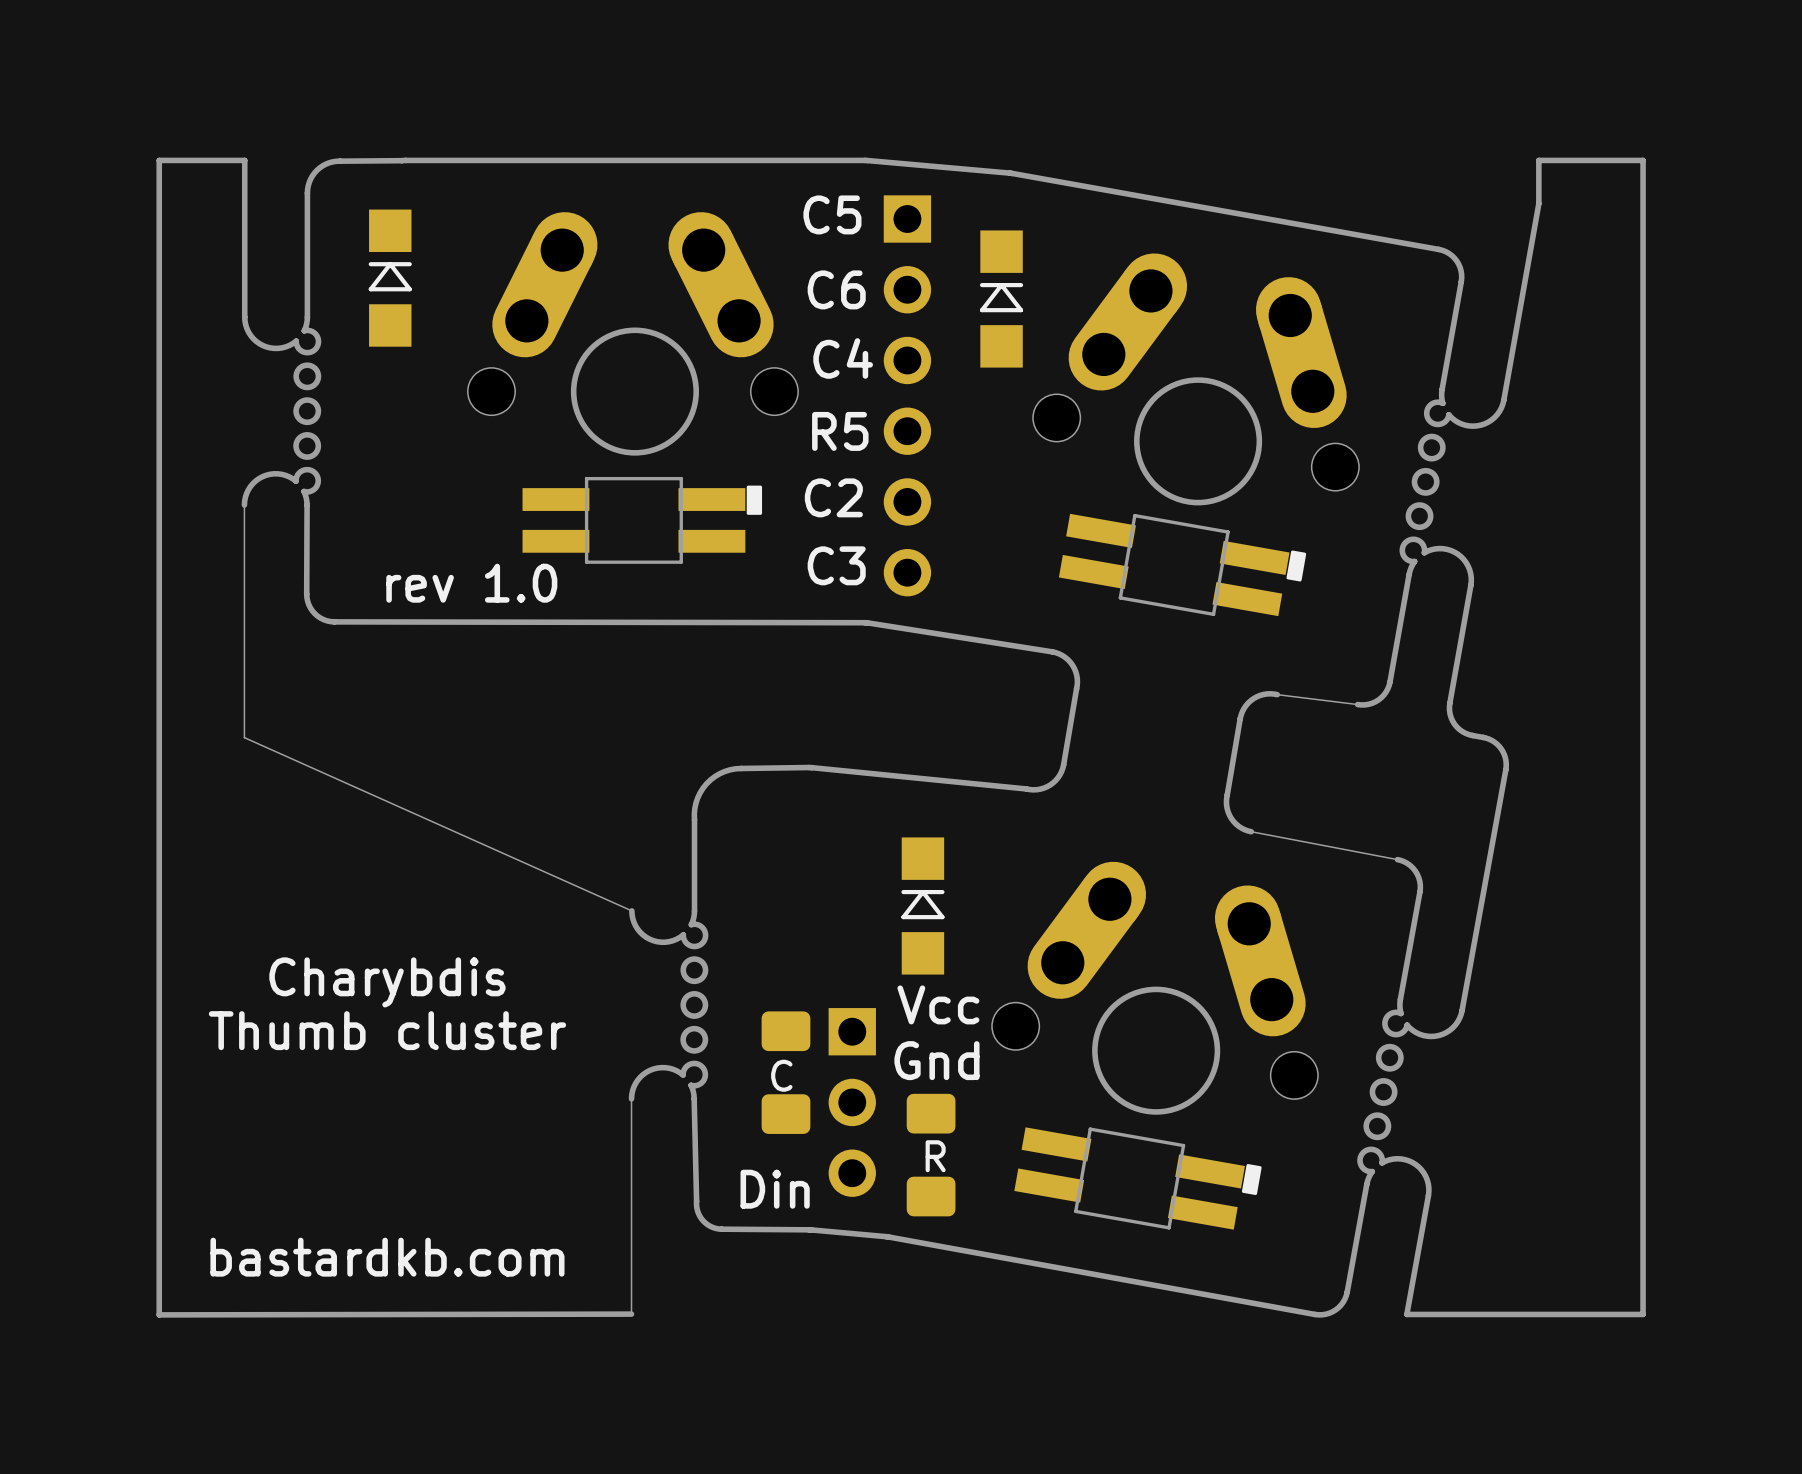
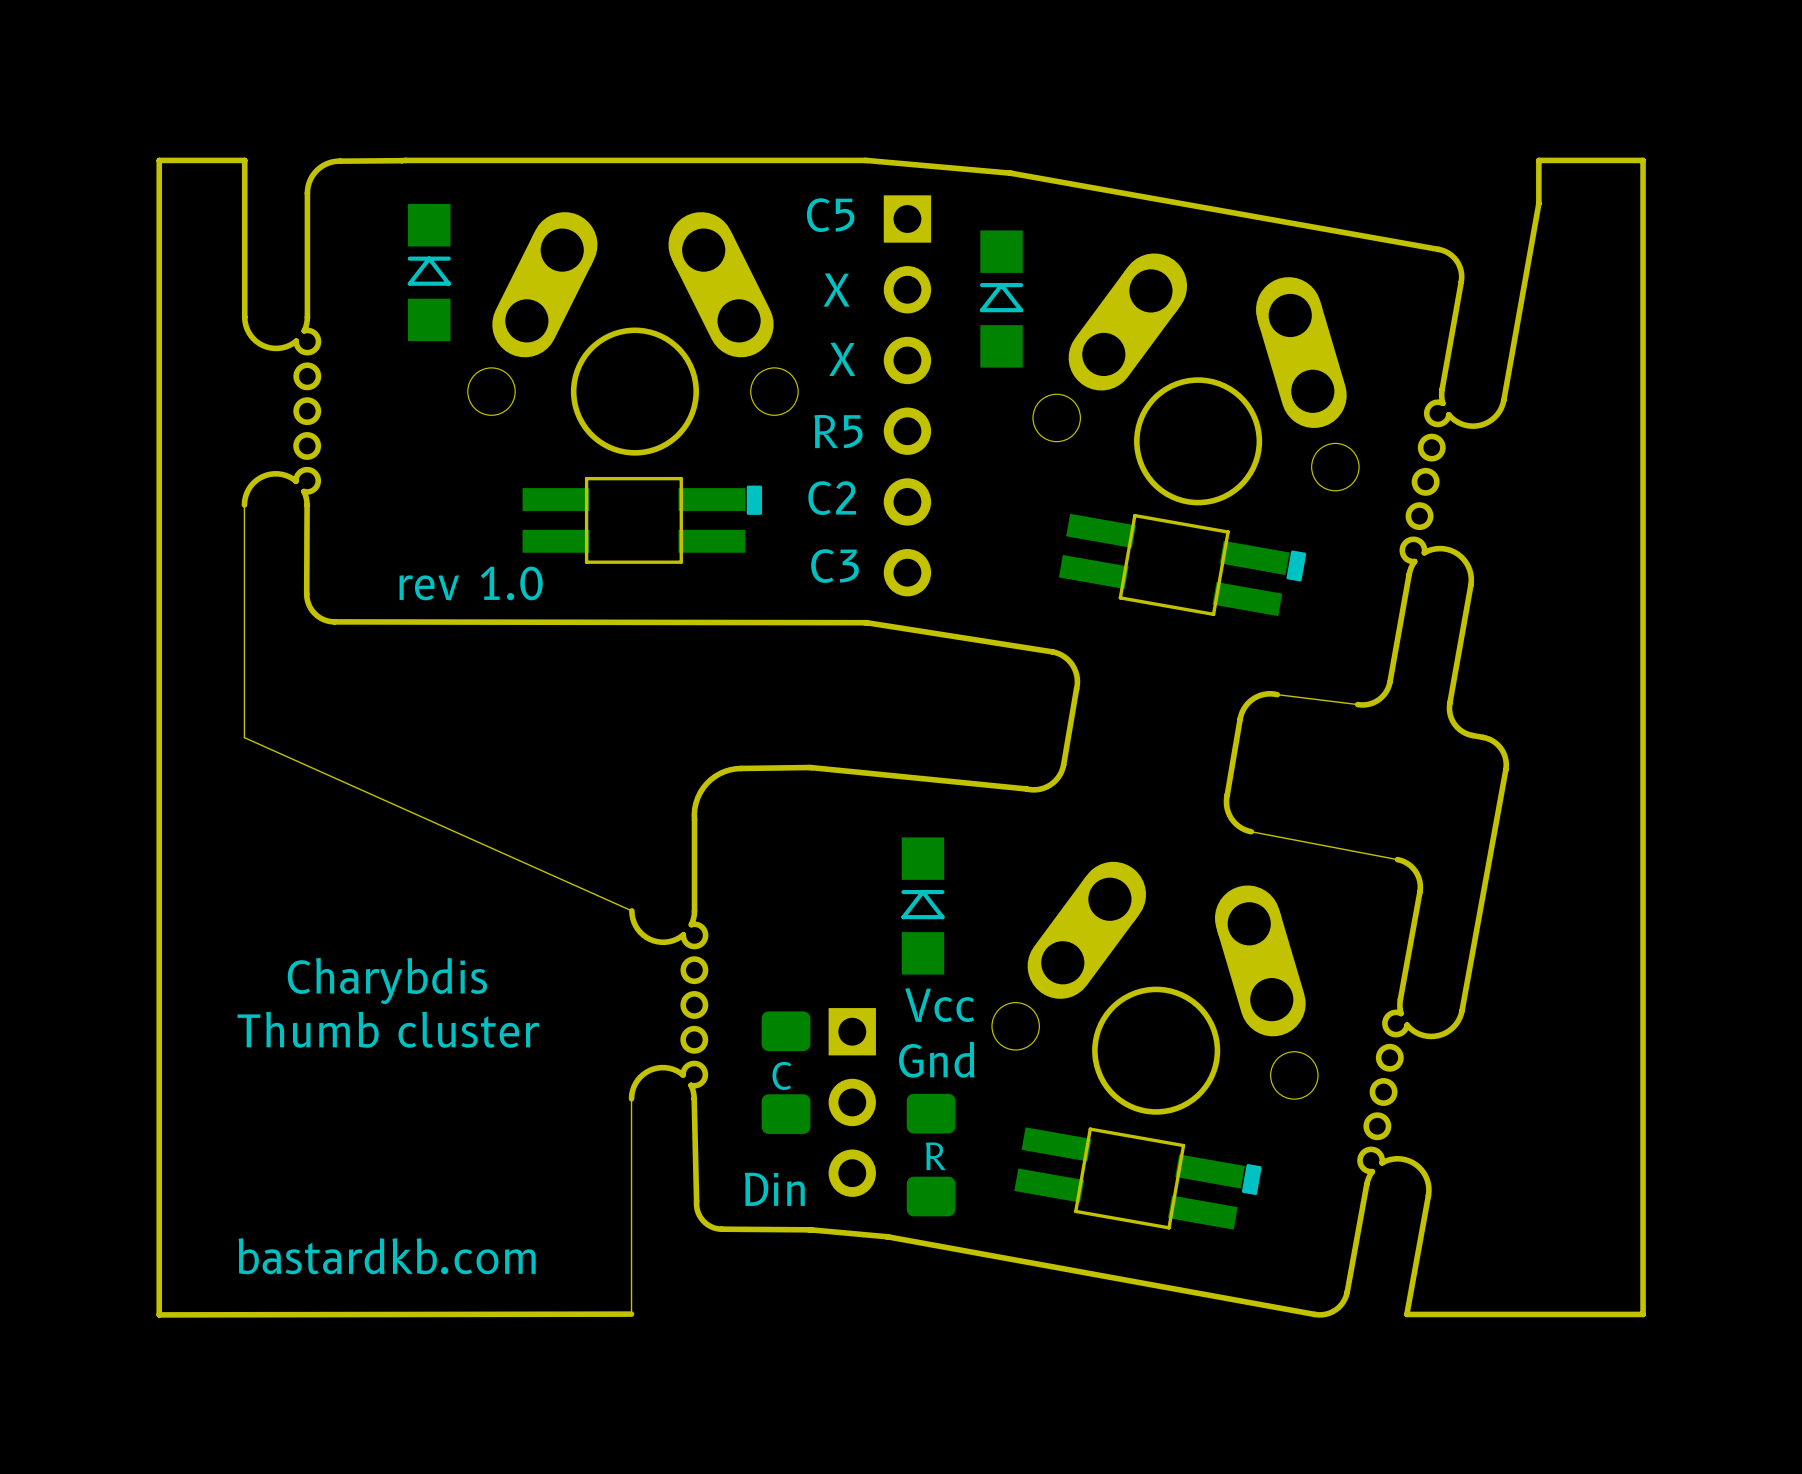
part position: (390, 278) -> (429, 272)
text: C6 (836, 289) -> X (836, 289)
text: C4 (843, 358) -> X (842, 359)

